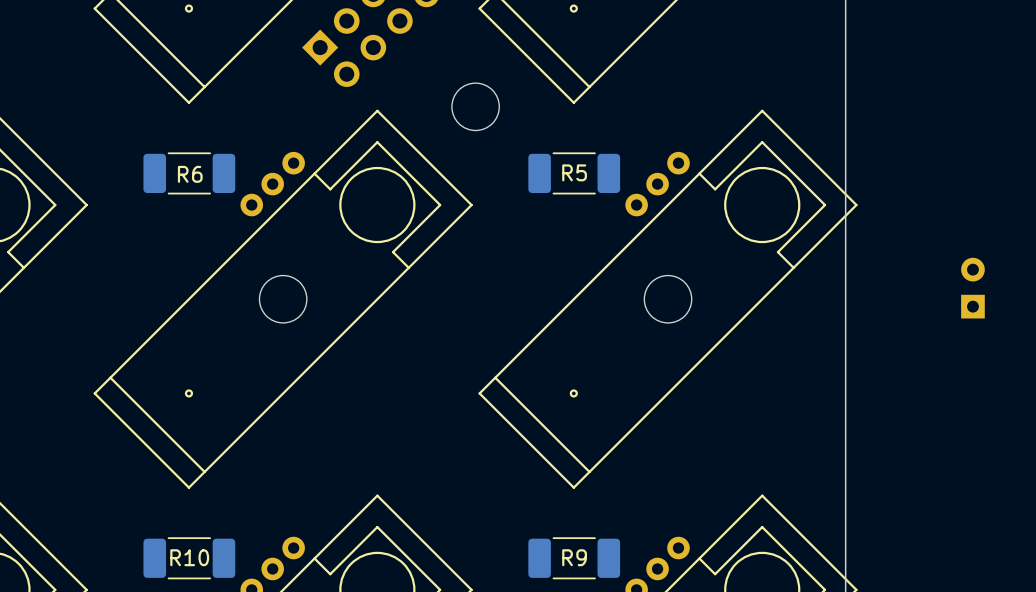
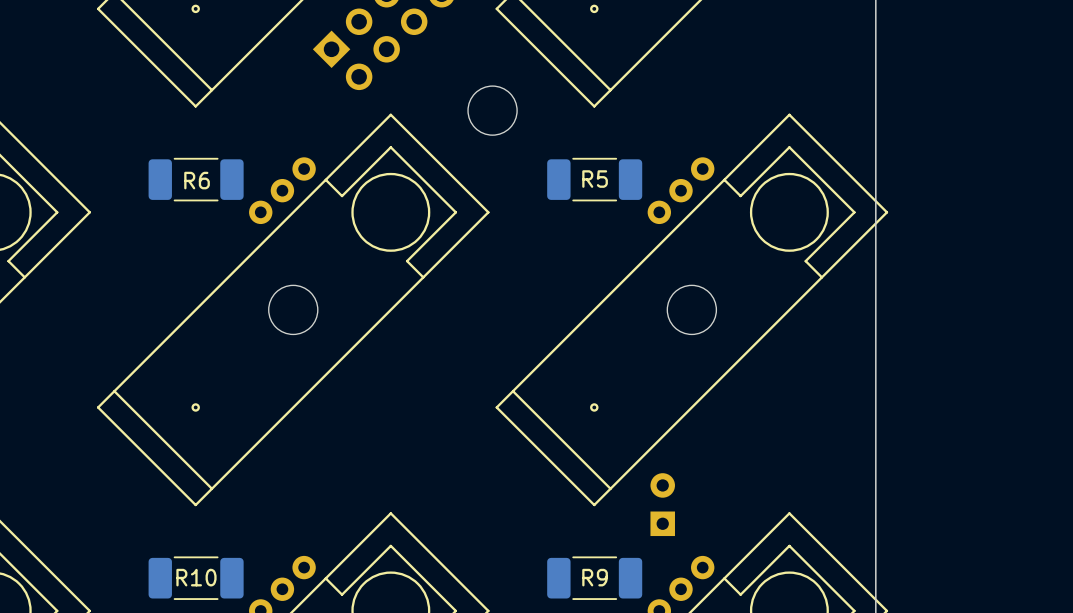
part: (972, 288) -> none
part: none -> (662, 504)

